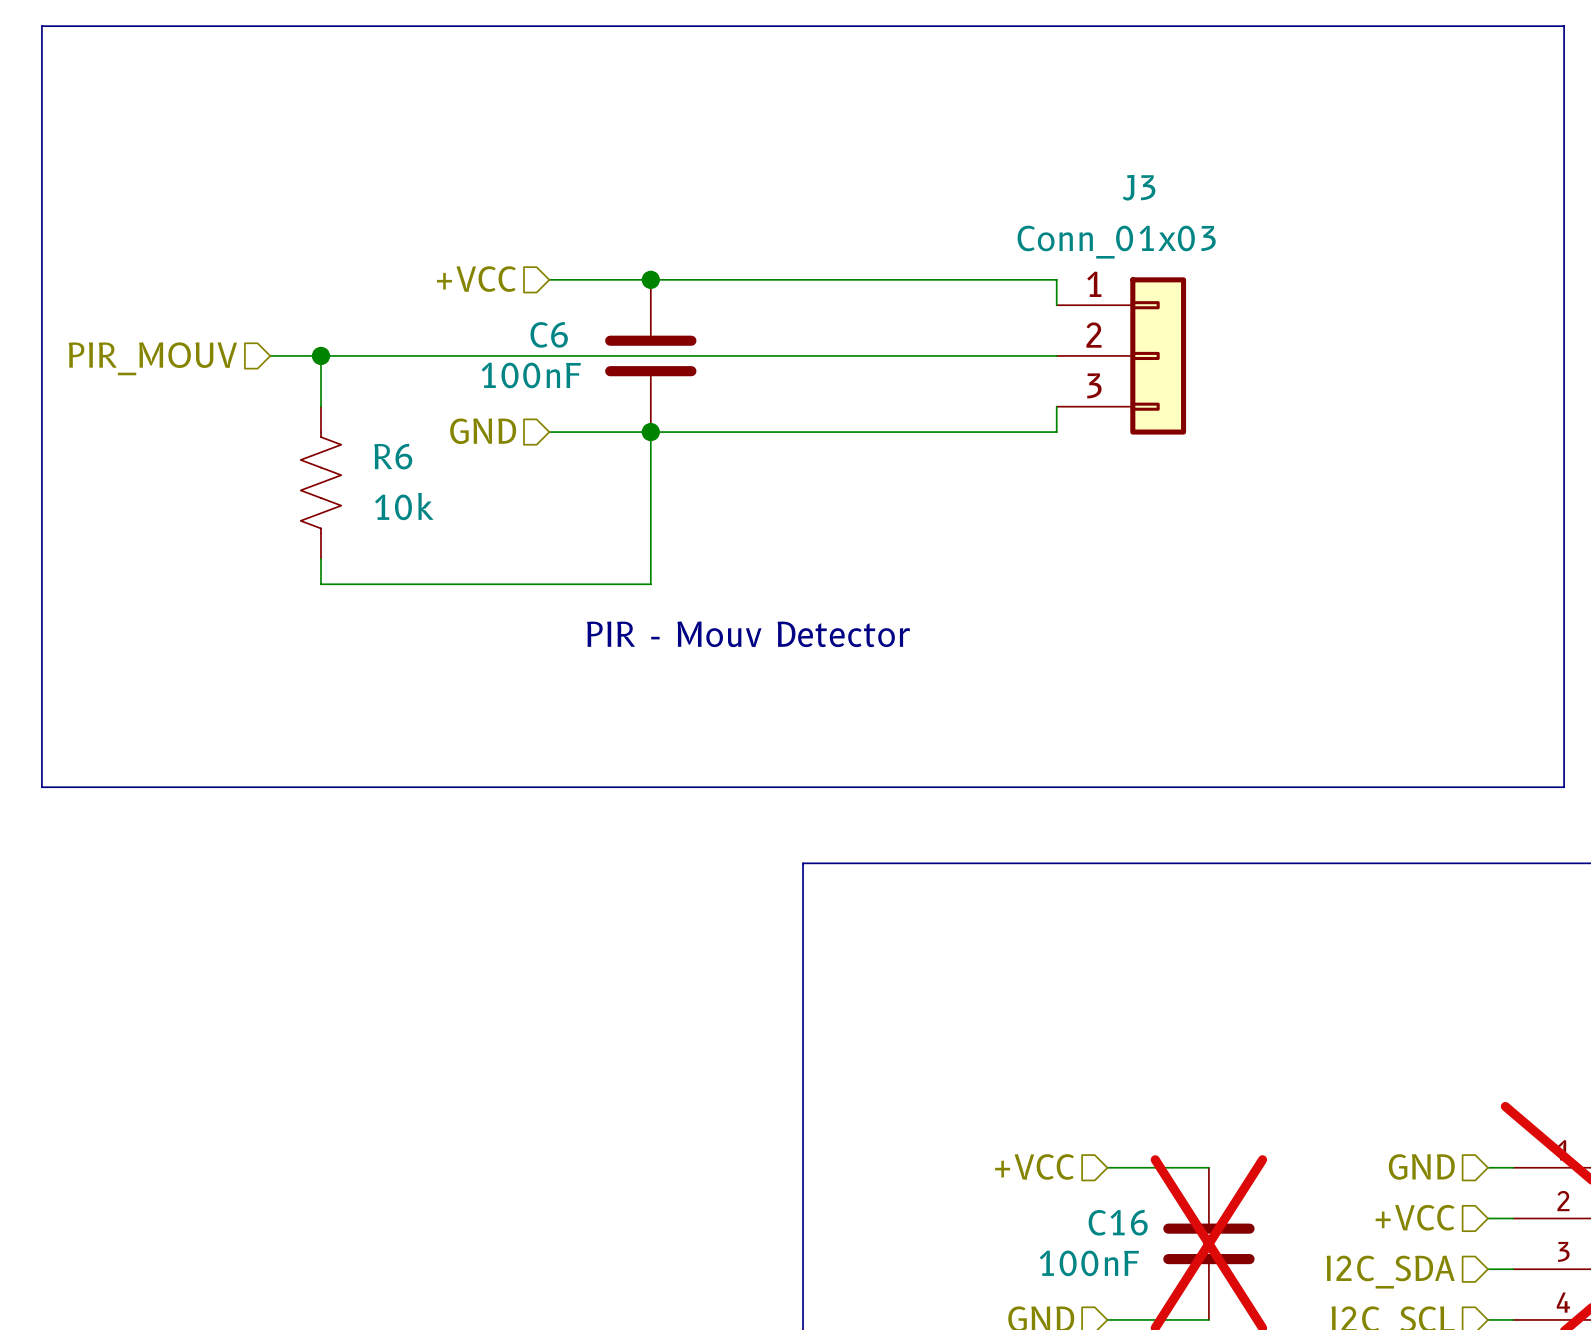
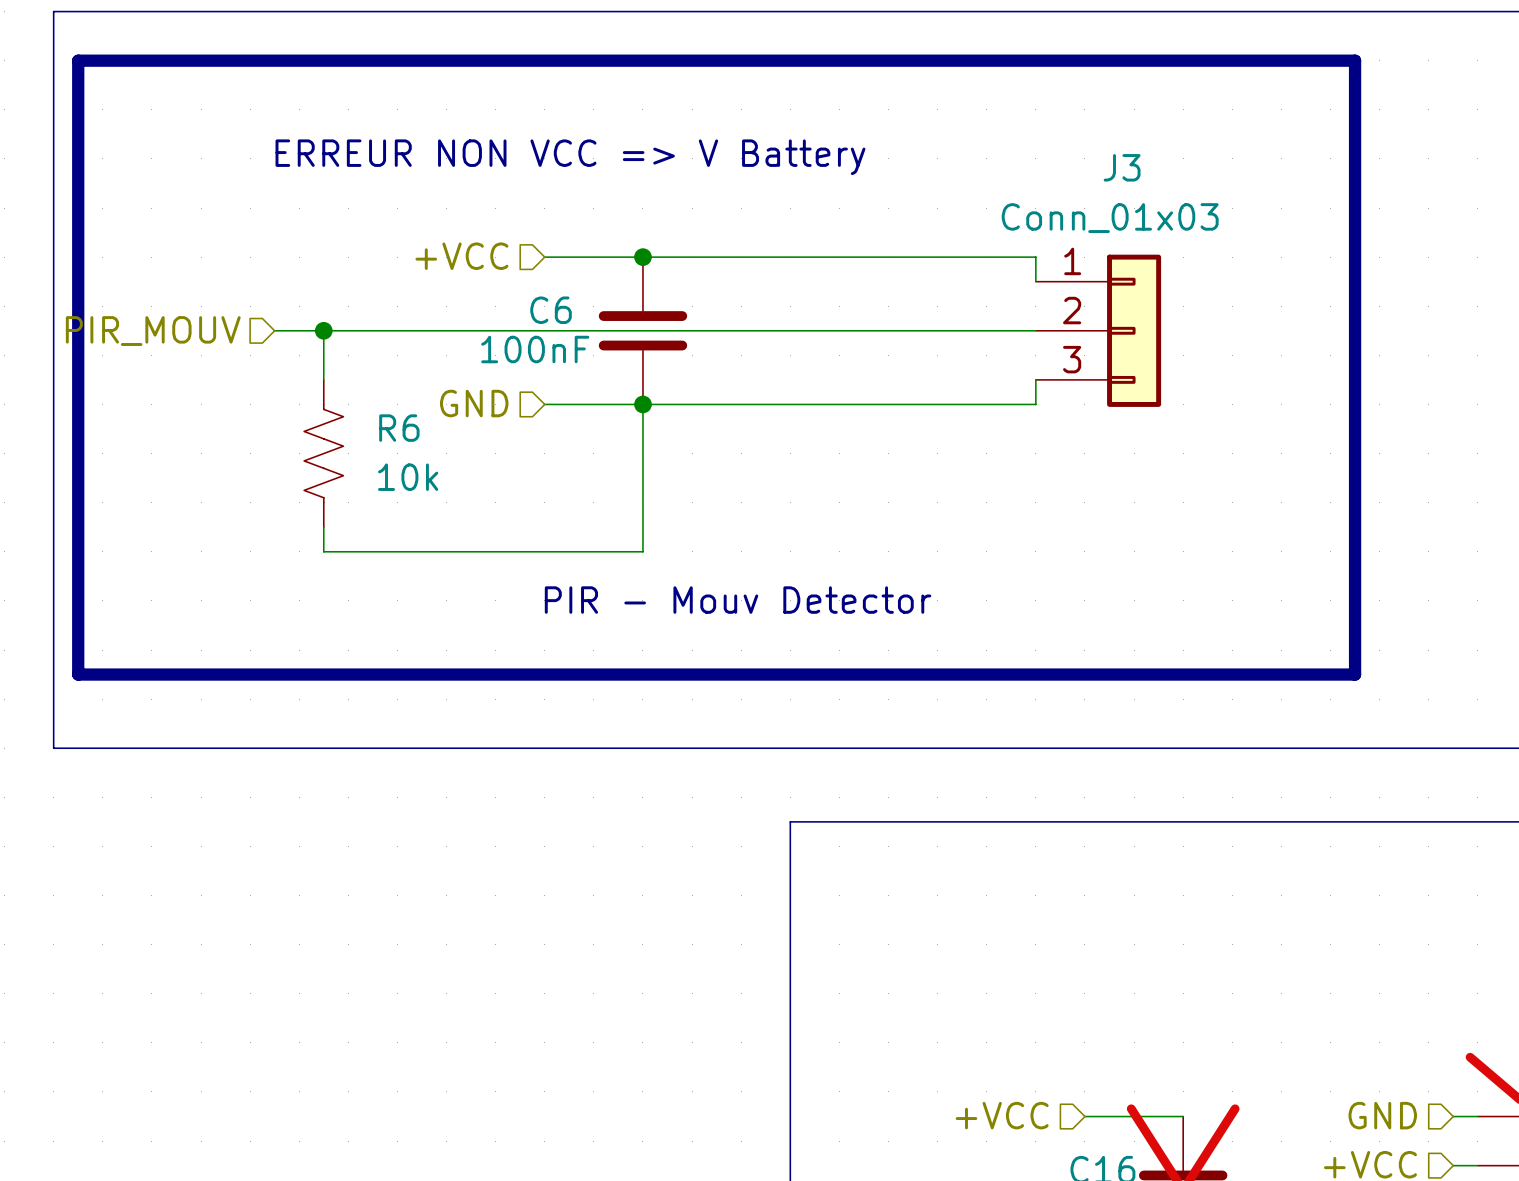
line: none -> (78, 60) (1355, 60) (1355, 674) (78, 674) (78, 60)
text: none -> ERREUR NON VCC => V Battery (570, 157)

